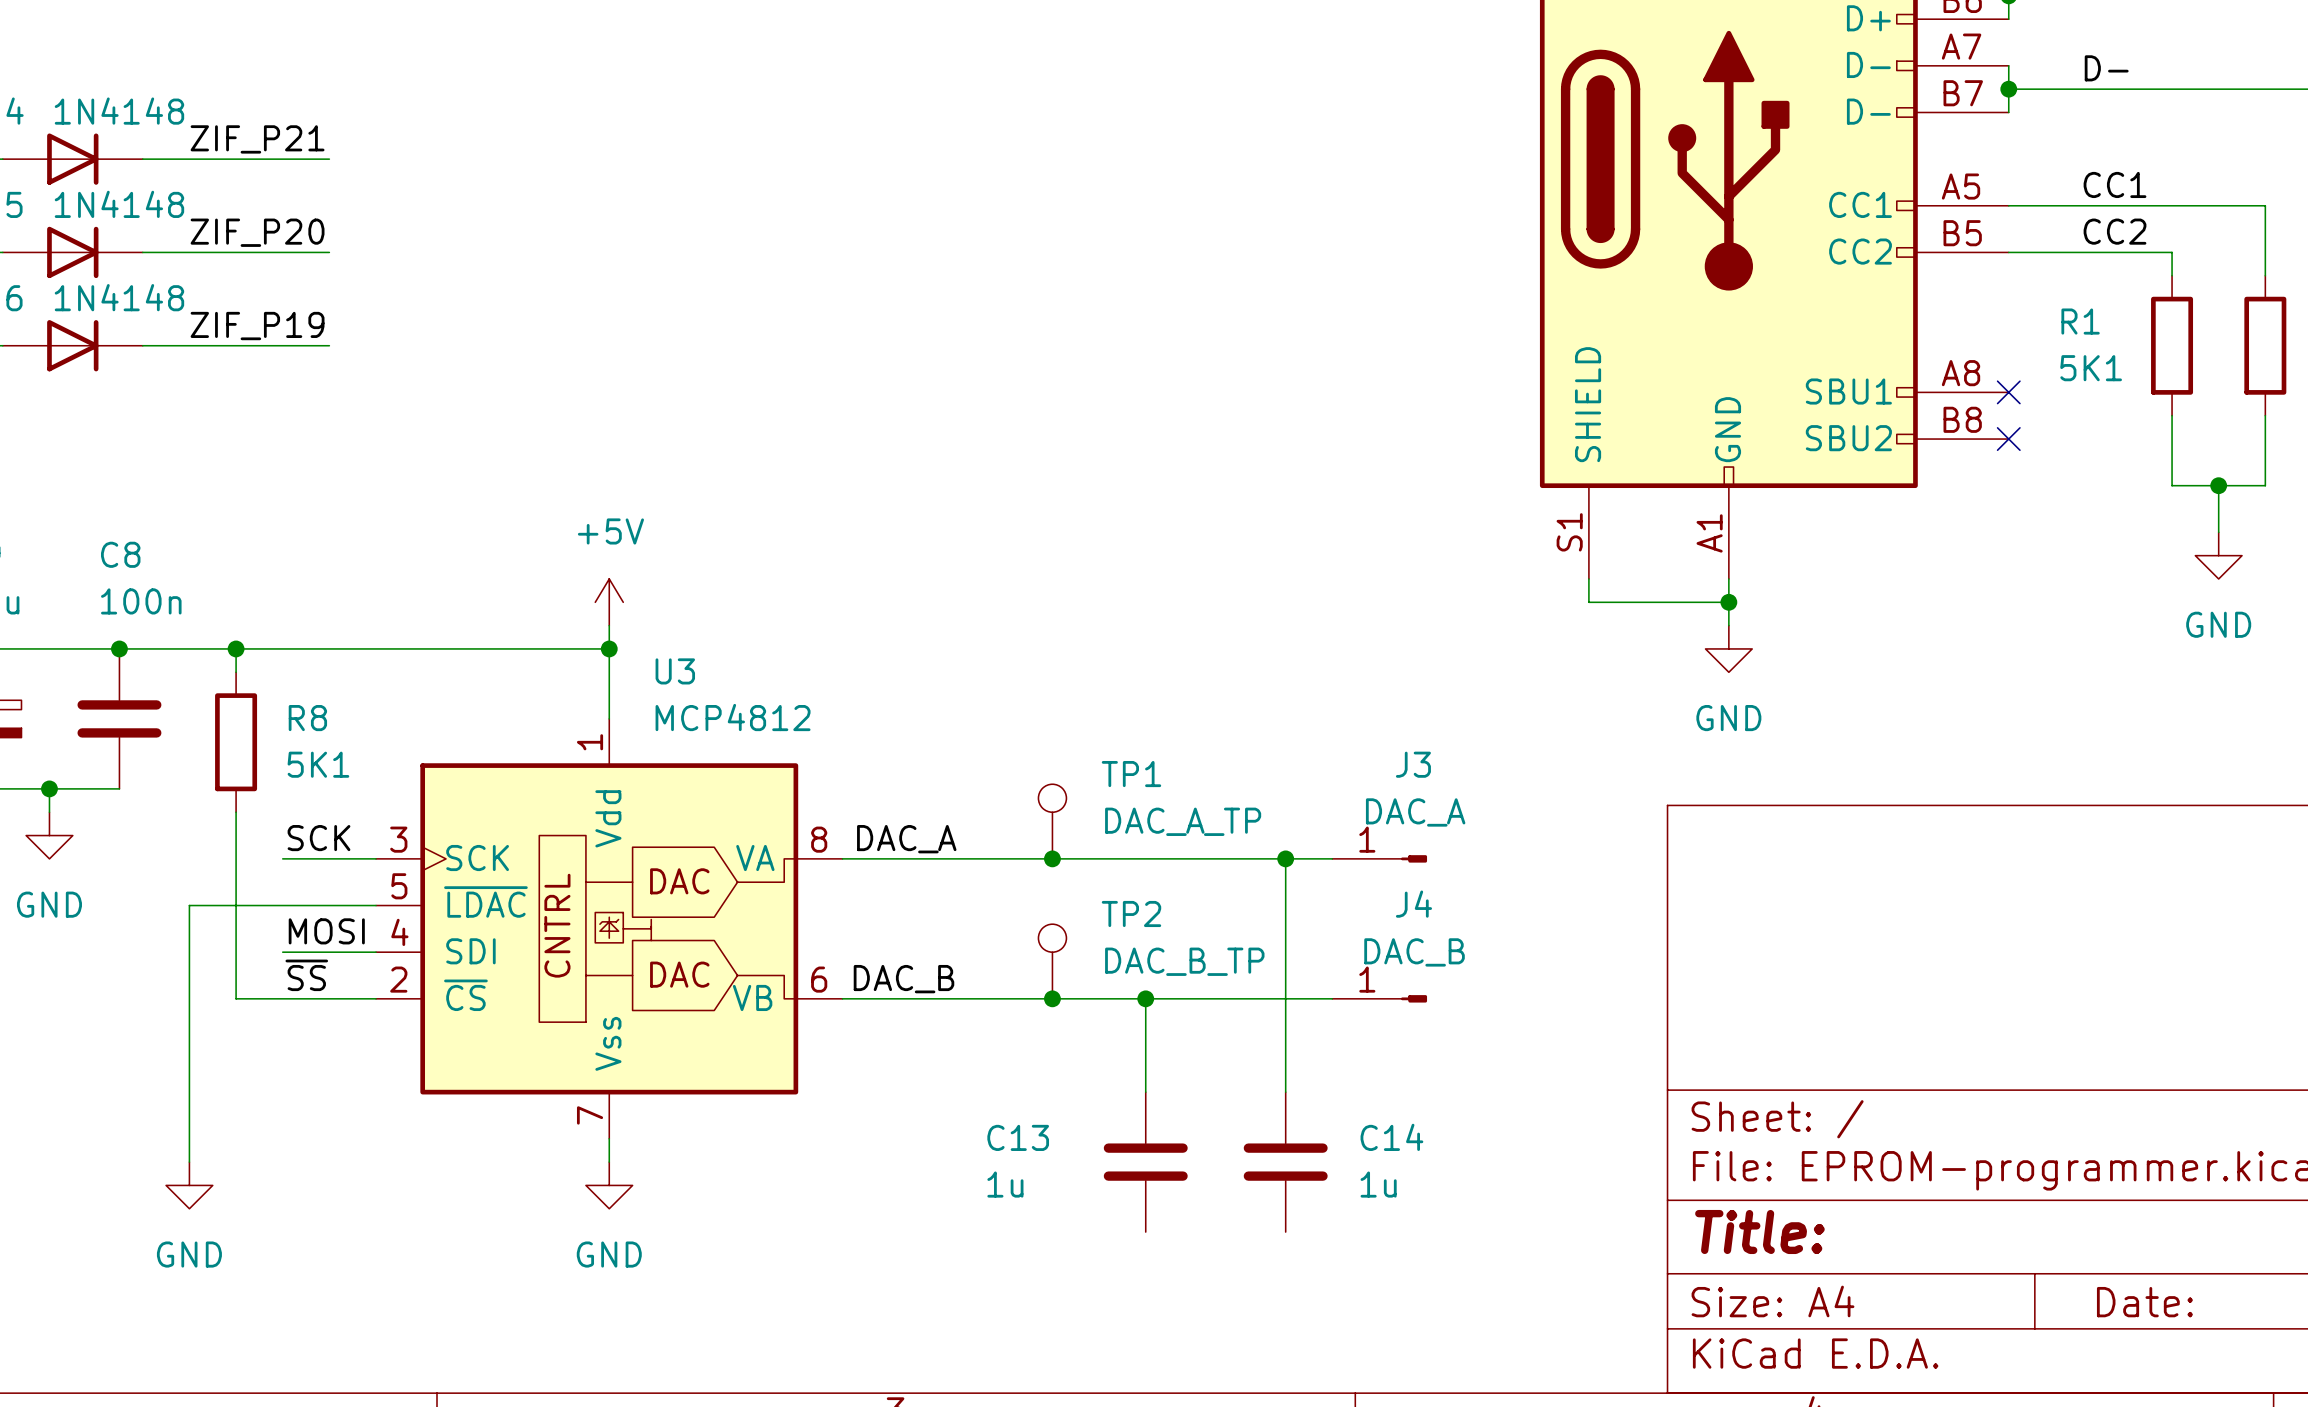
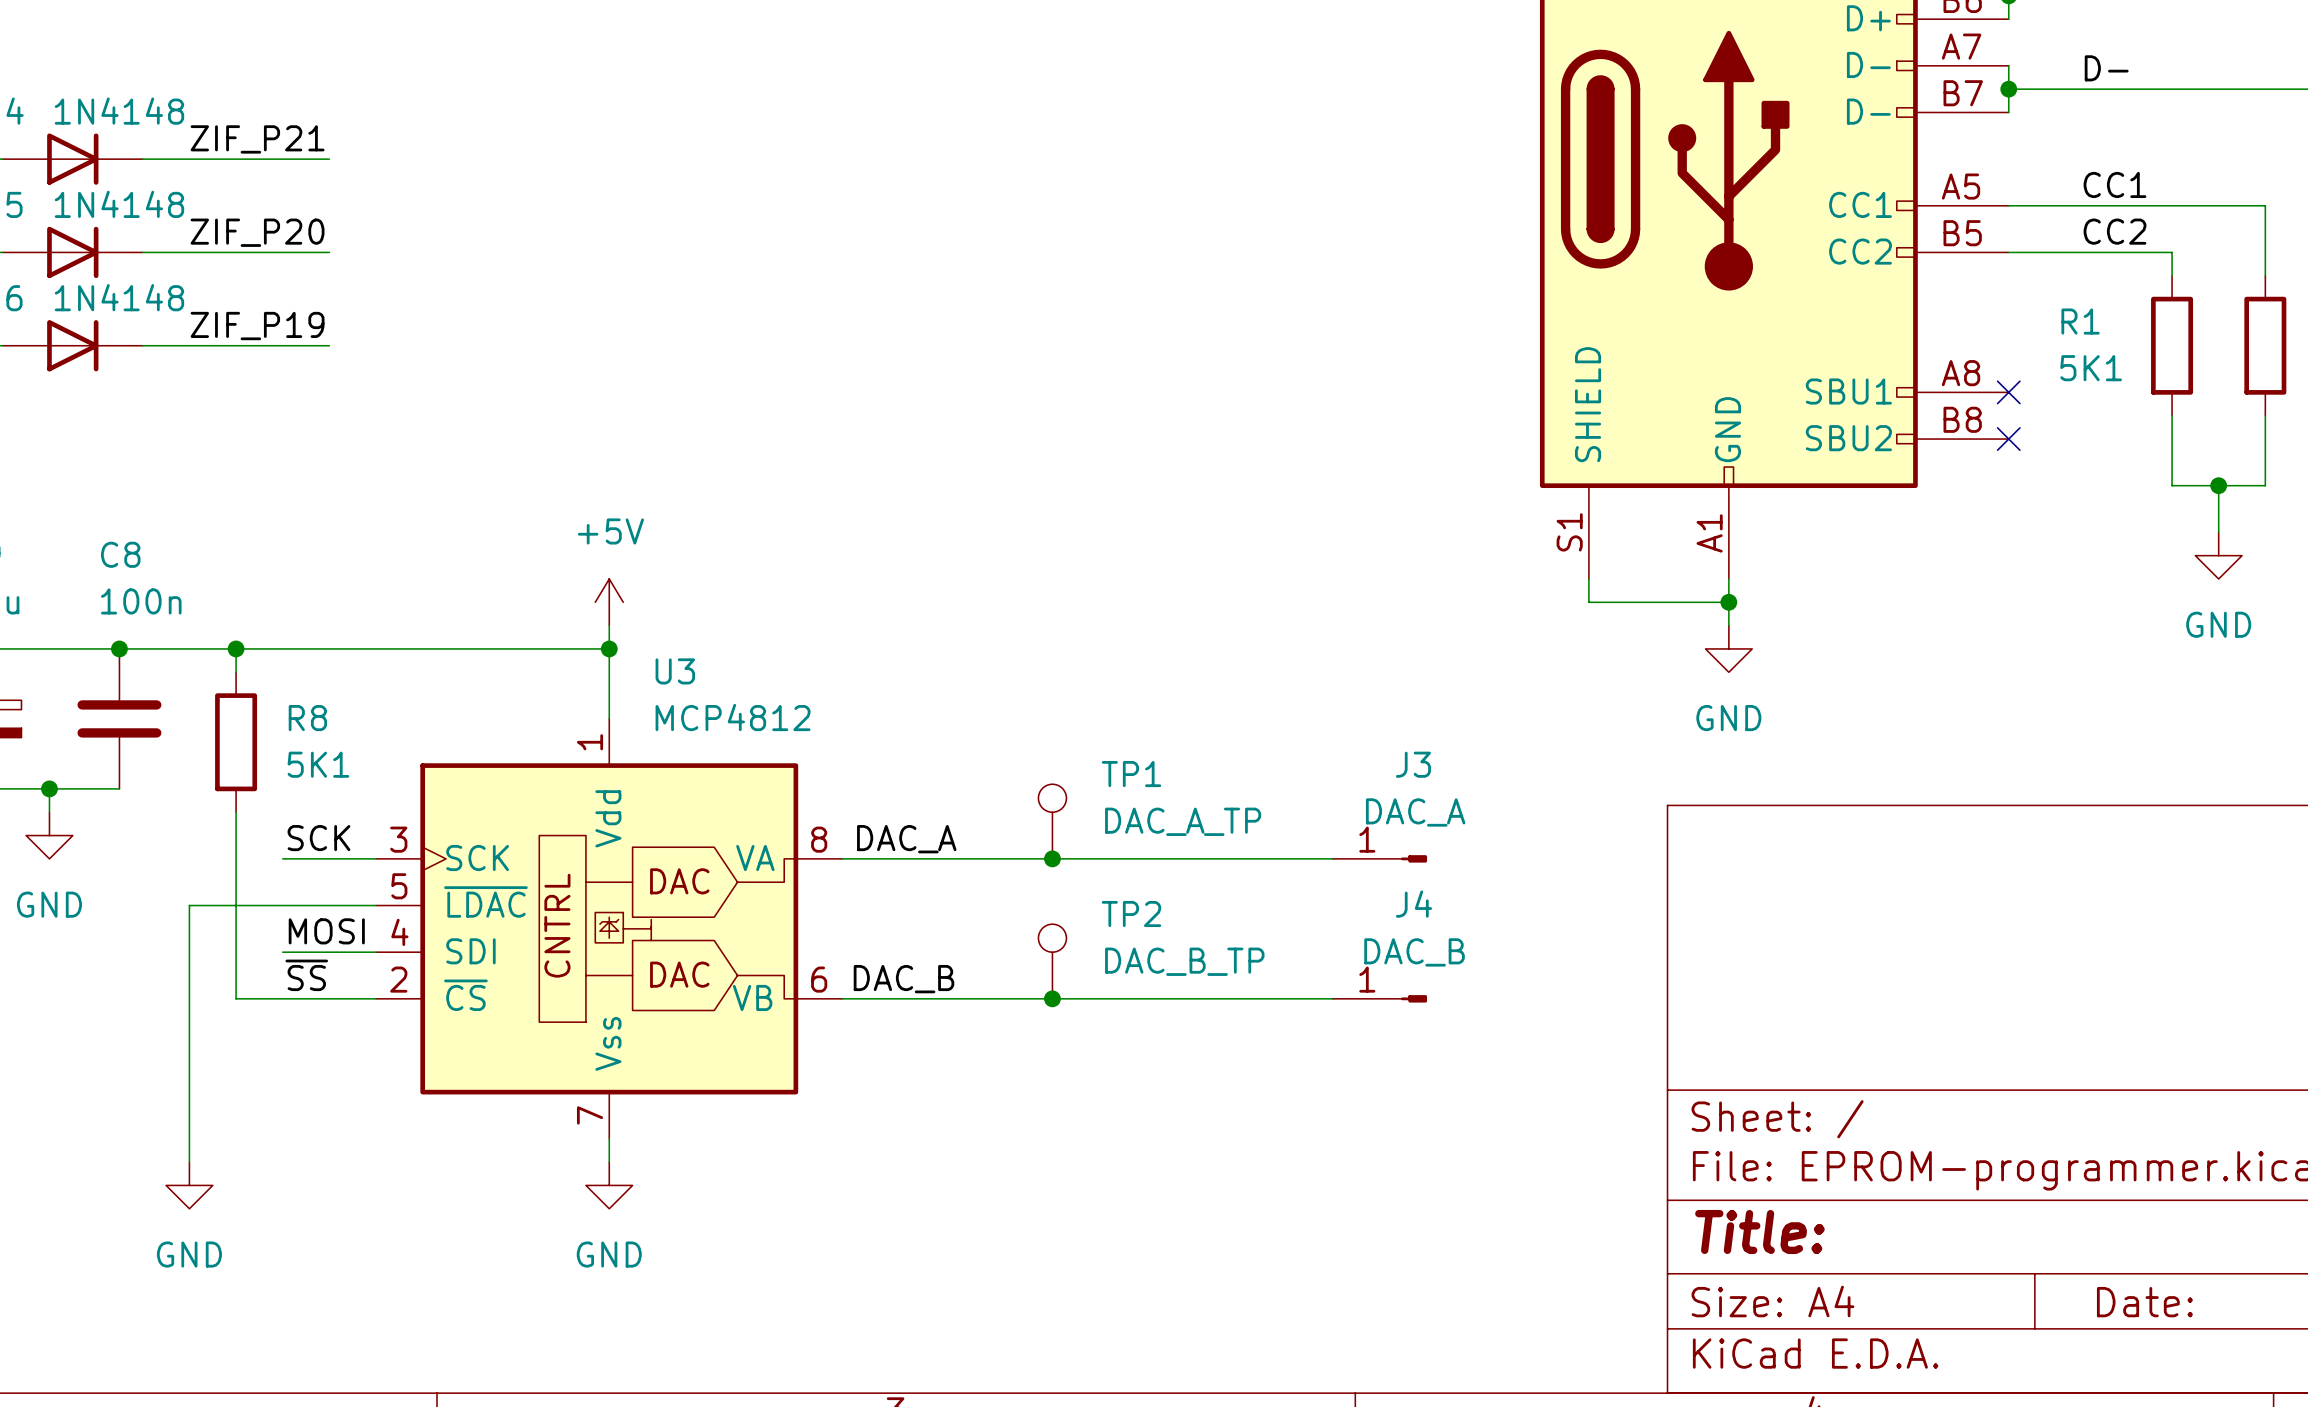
wire: (1285, 858) (1285, 1092) -> none
junction: (1285, 858) -> none
wire: (1145, 998) (1145, 1092) -> none
junction: (1145, 998) -> none
C13: 1u (1145, 1162) -> none
C14: 1u (1285, 1162) -> none

